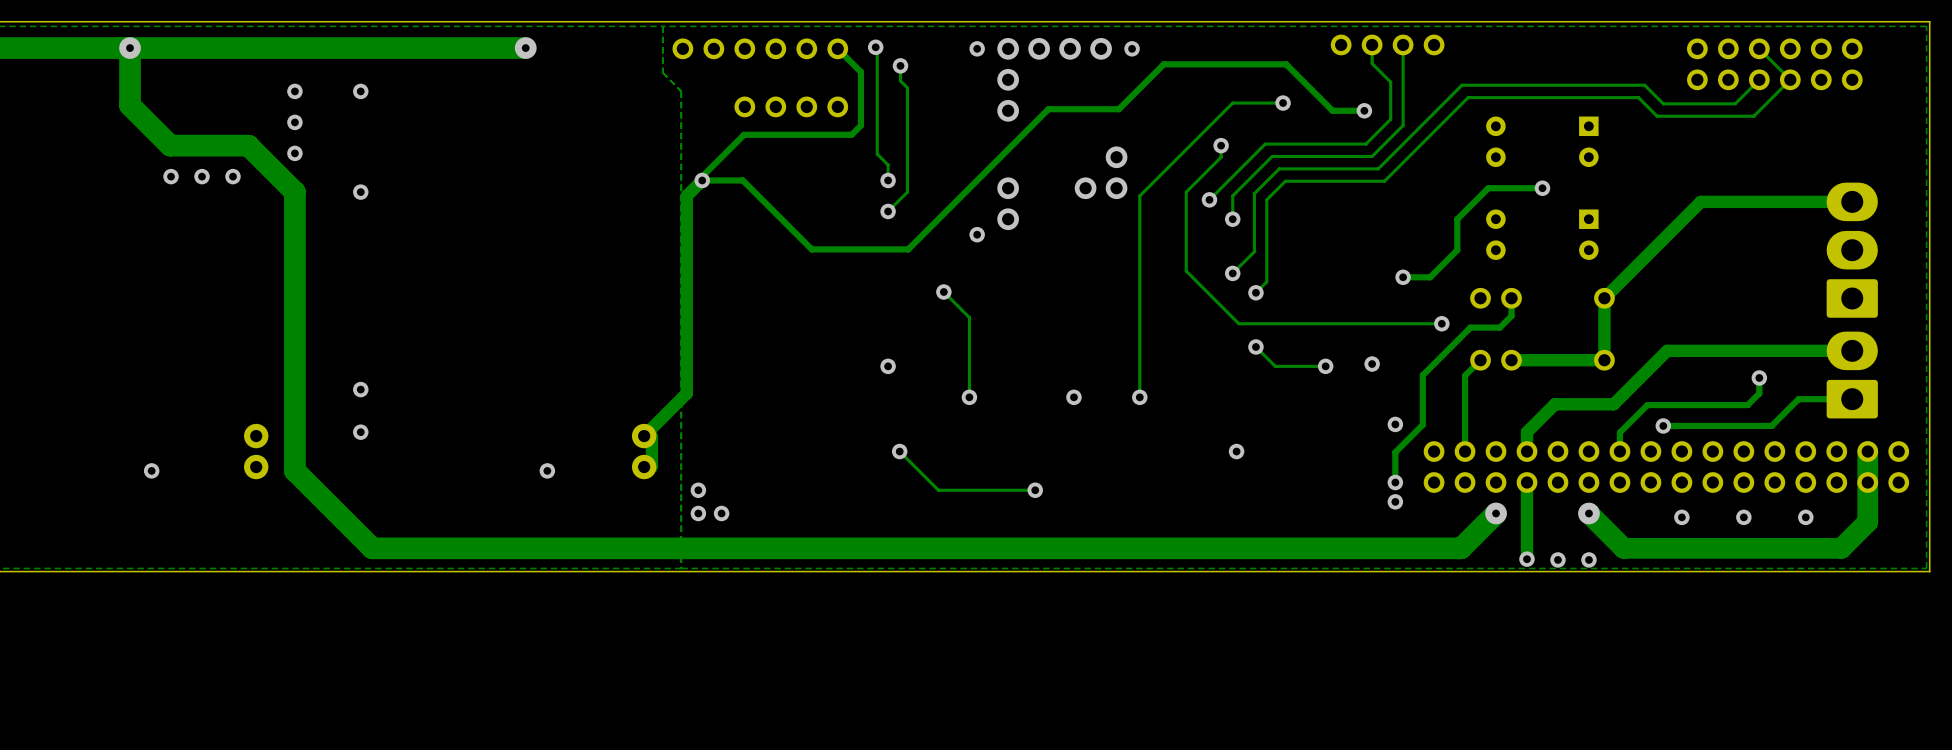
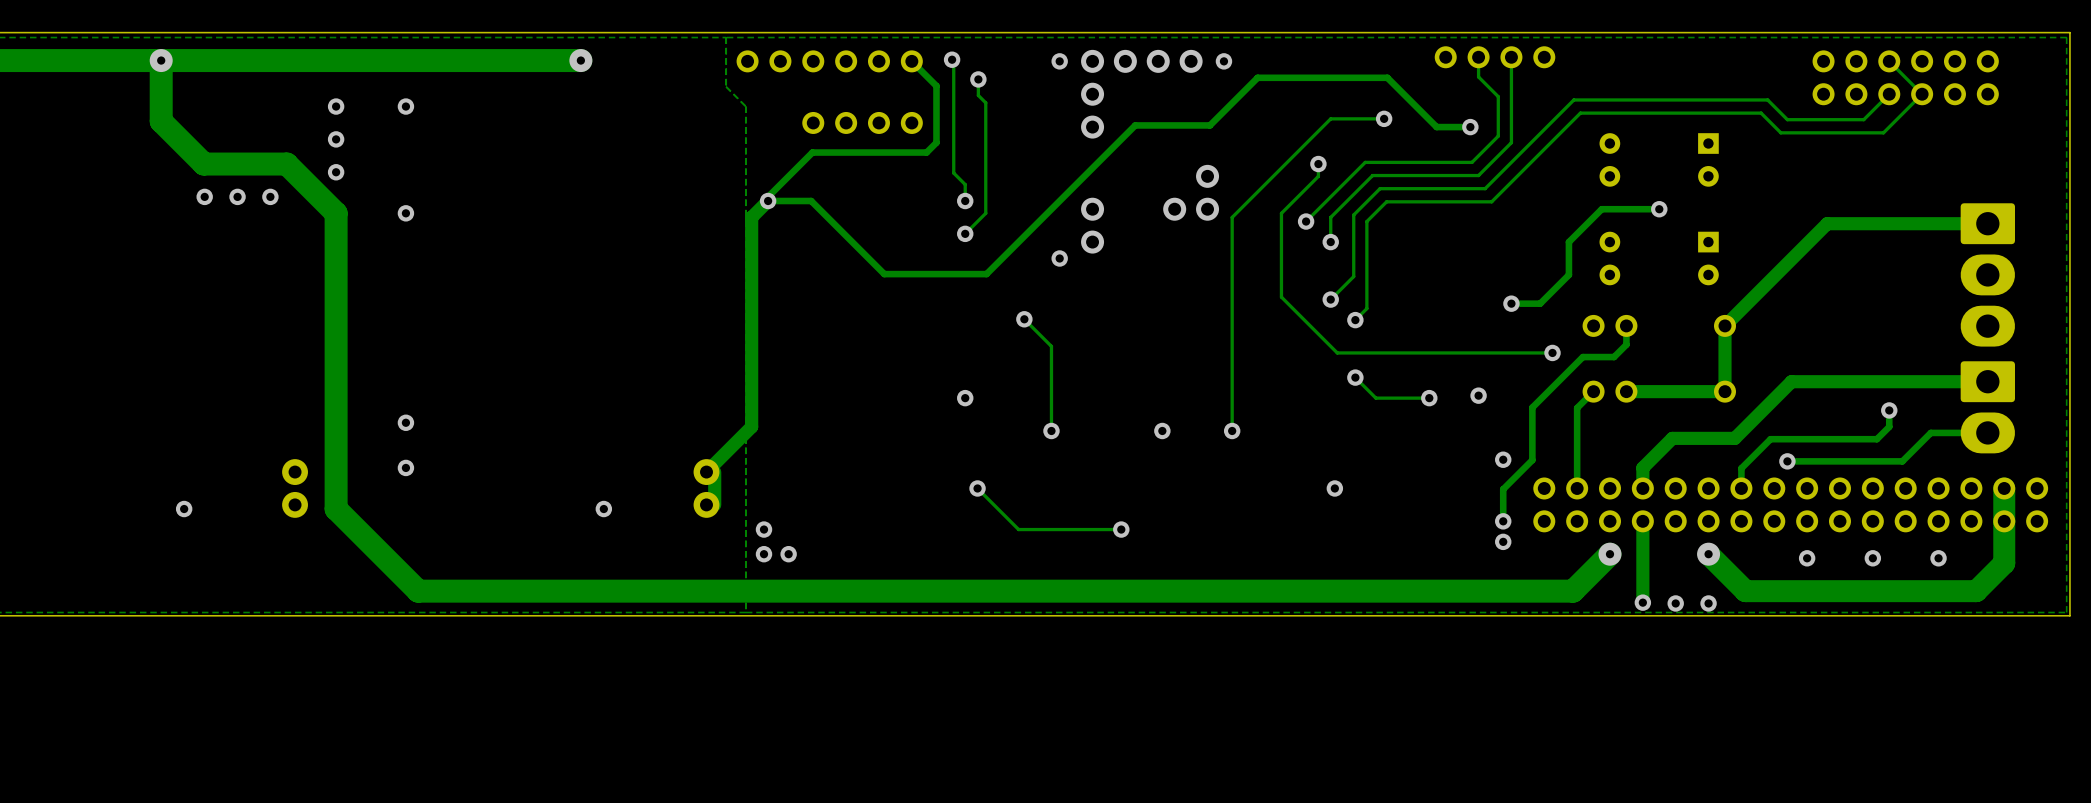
part rotation: 0° (1852, 250) -> 180° (1987, 274)
part rotation: 0° (1852, 375) -> 180° (1987, 407)

